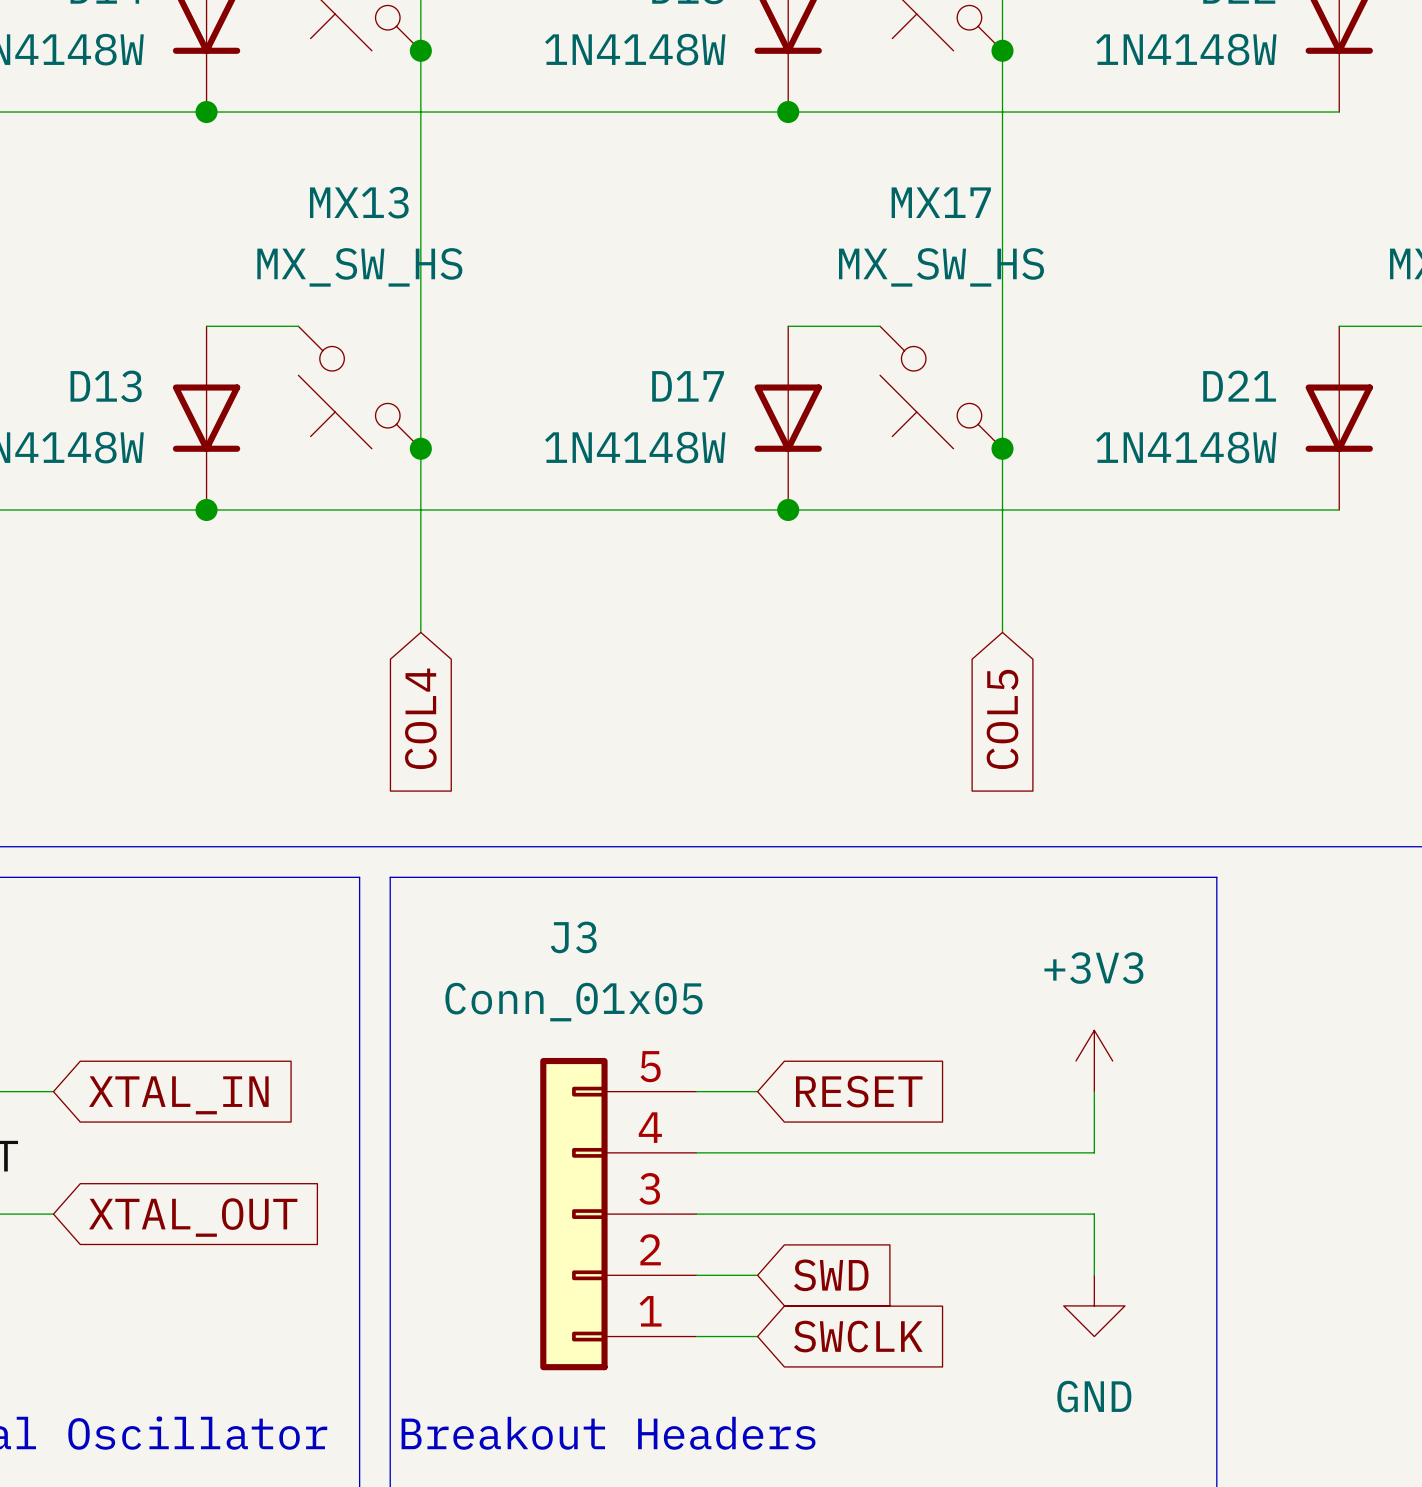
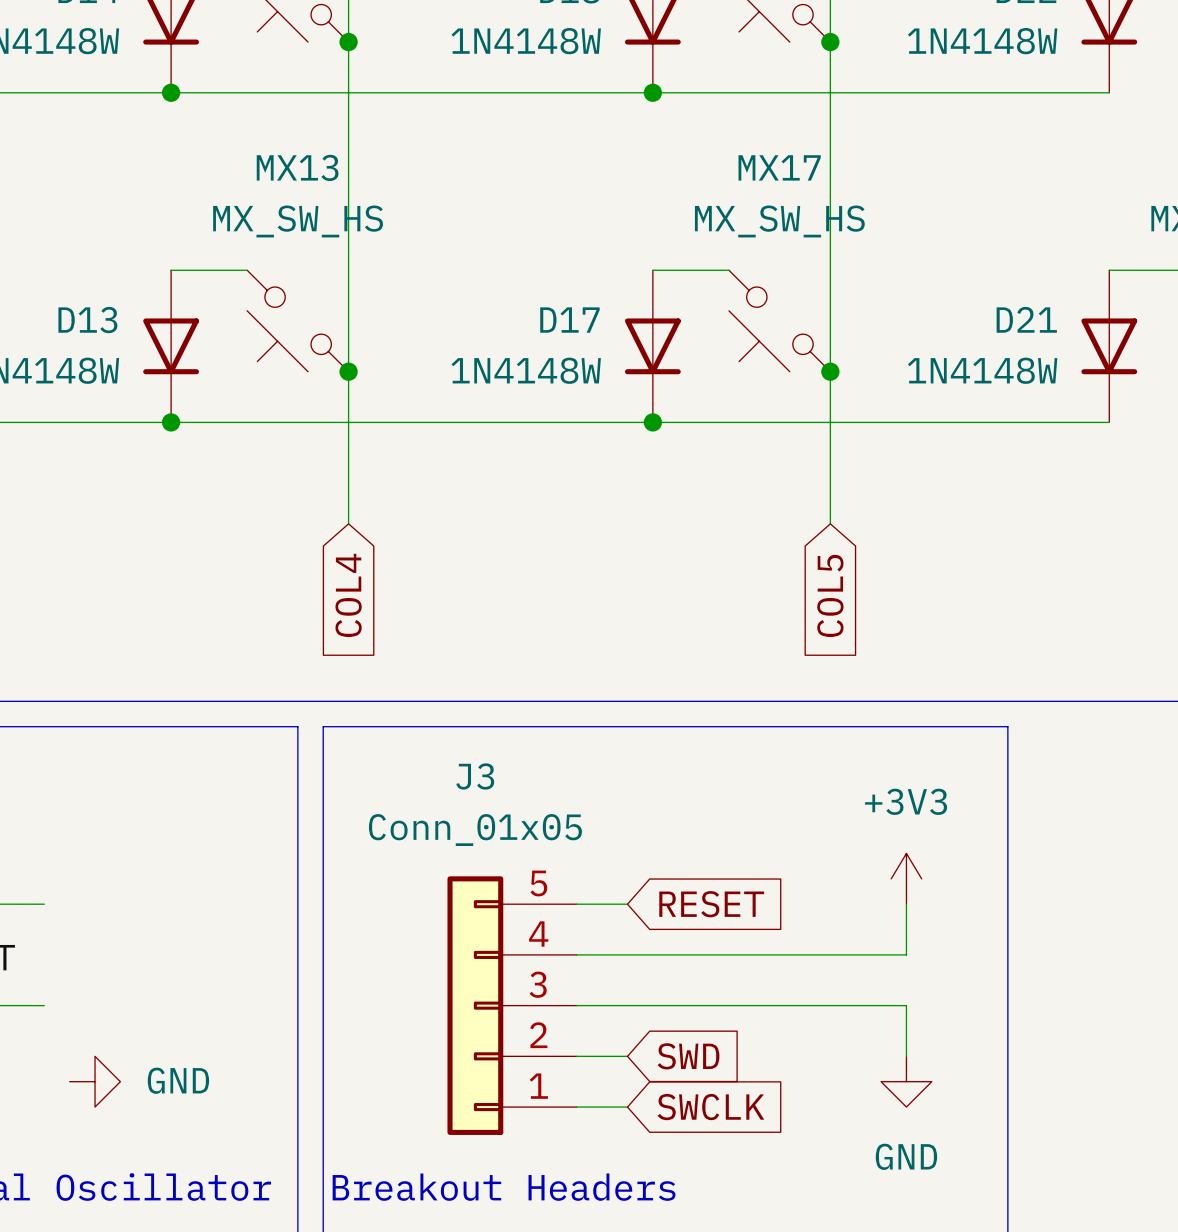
global label: XTAL_IN (178, 1095) -> none
global label: XTAL_OUT (193, 1217) -> none
power symbol: none -> GND (95, 1081)

